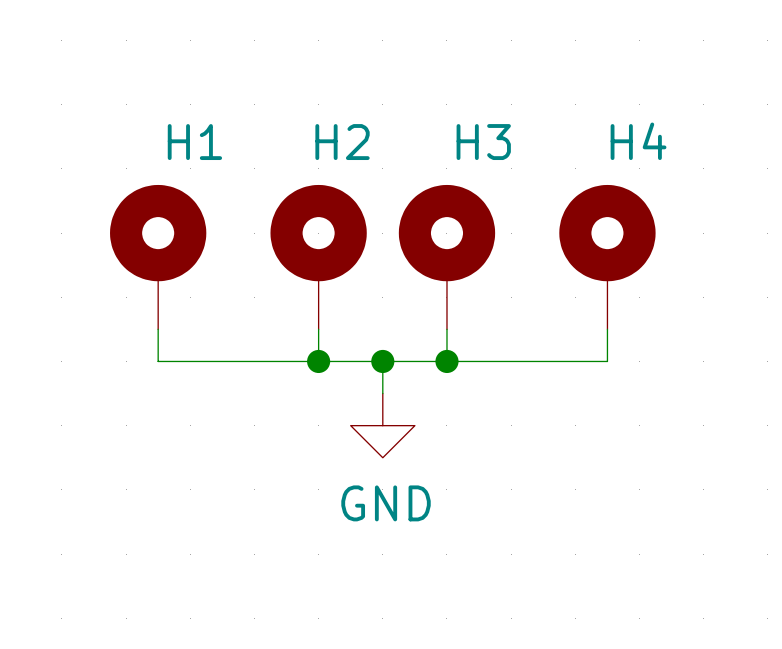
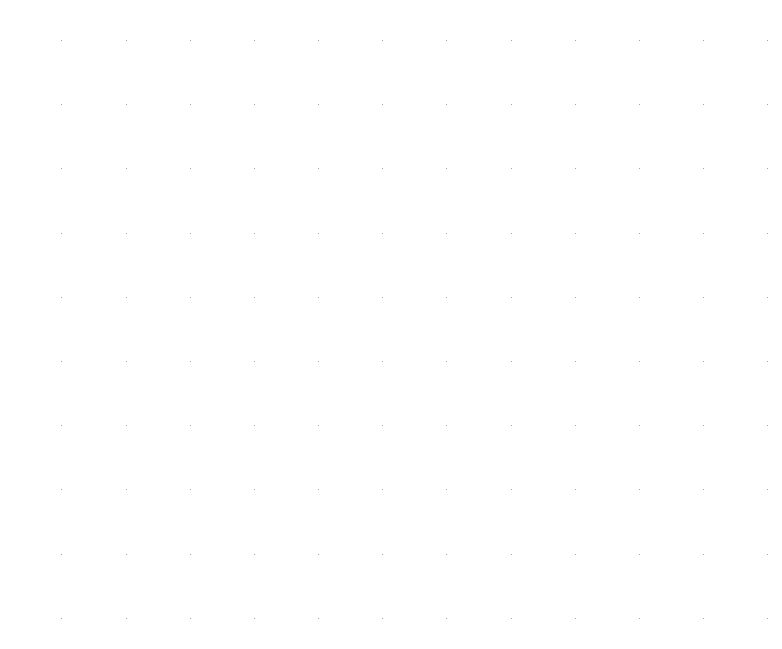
H1: (158, 257) -> none
H2: (318, 257) -> none
H3: (446, 257) -> none
H4: (607, 257) -> none
wire: (158, 329) (158, 361) (607, 361) (607, 329) -> none
wire: (318, 329) (318, 361) -> none
wire: (446, 329) (446, 361) -> none
junction: (318, 361) -> none
wire: (382, 361) (382, 393) -> none
junction: (382, 361) -> none
junction: (446, 361) -> none
power symbol: GND (382, 425) -> none

